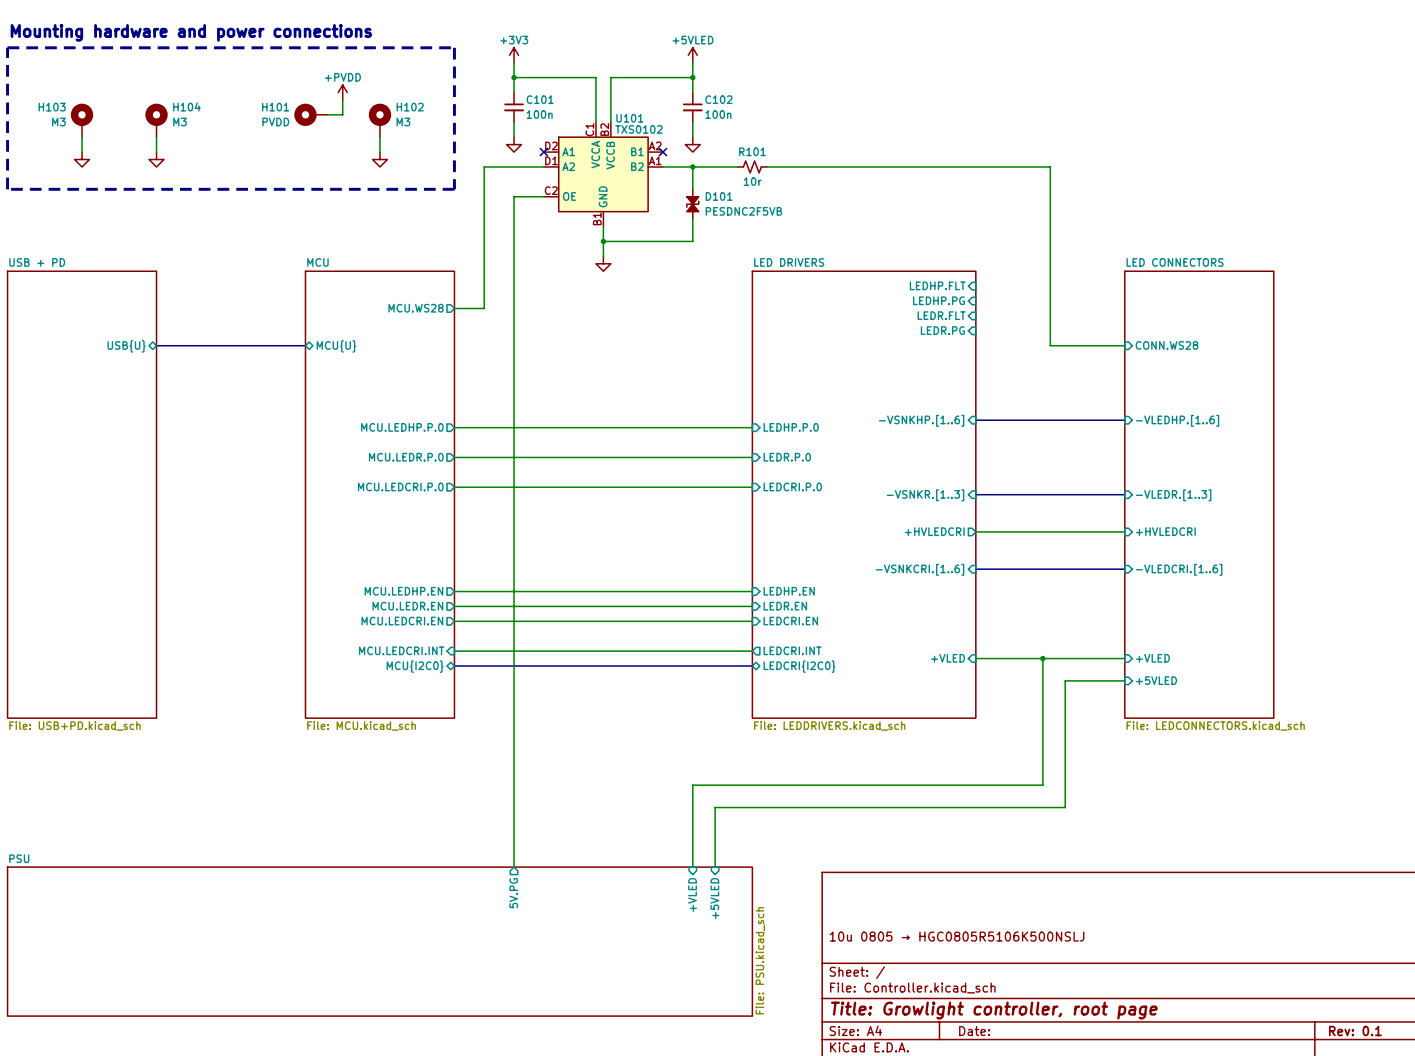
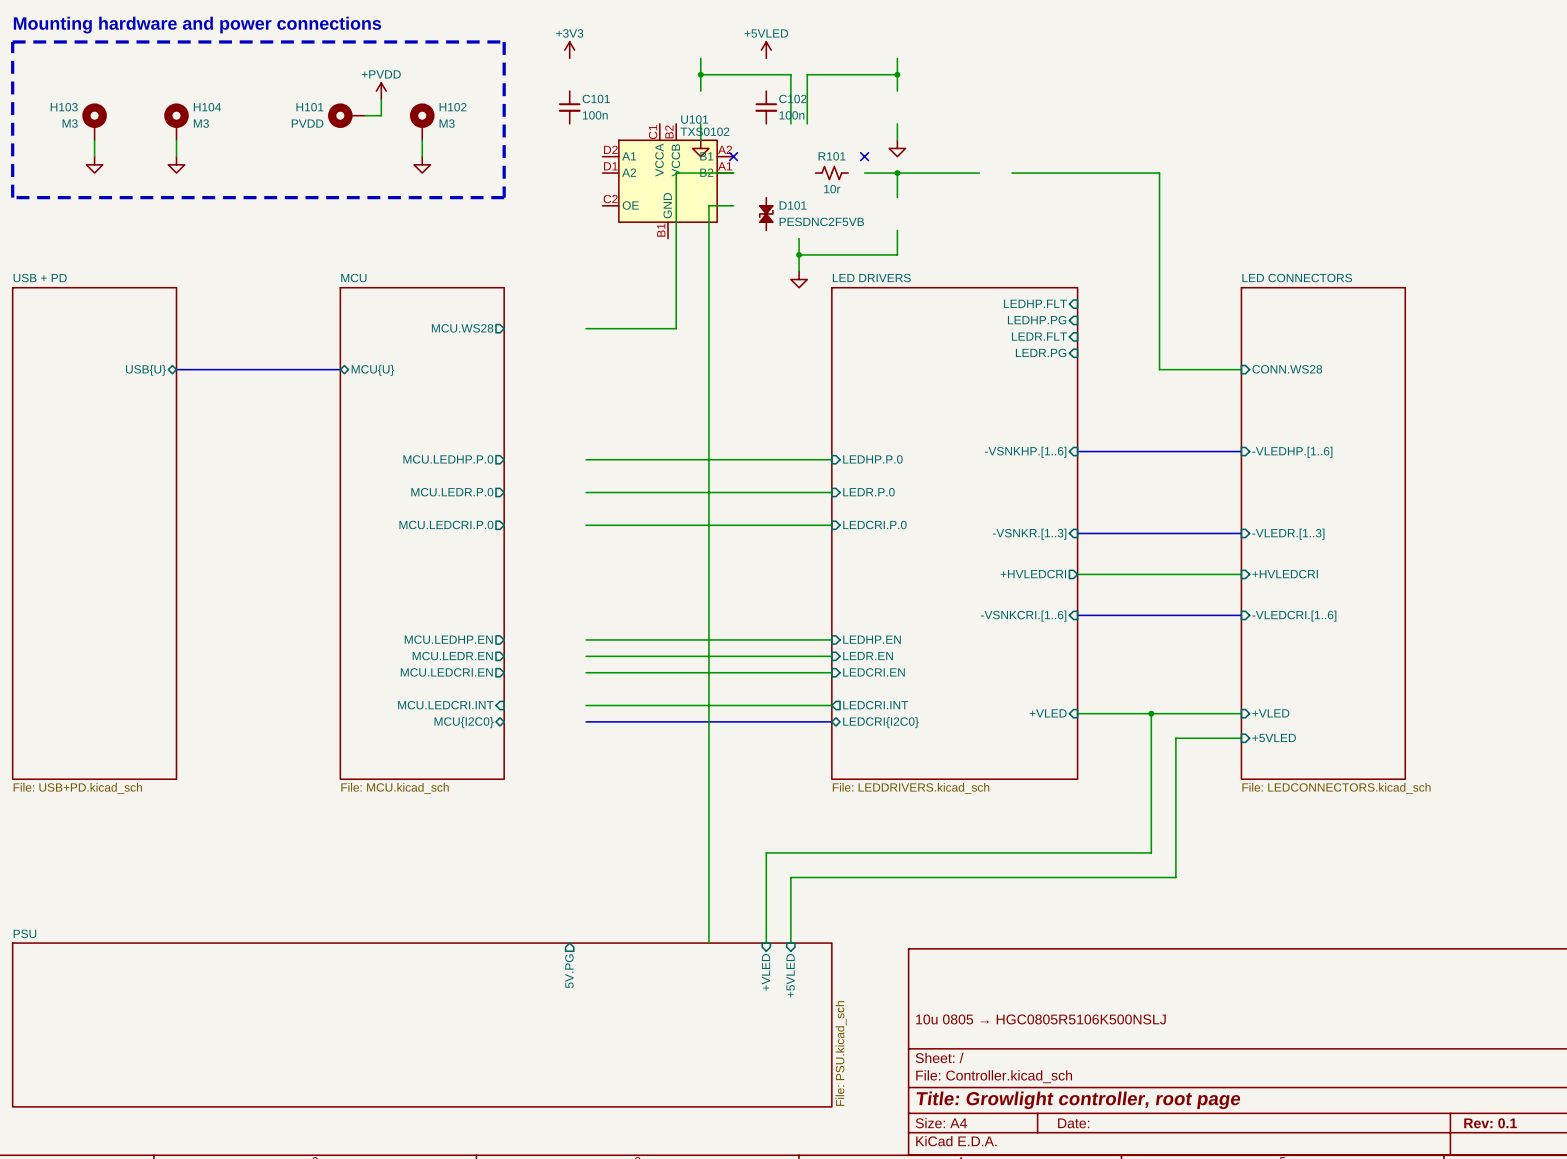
wire: (514, 62) (514, 92) -> (700, 58) (700, 91)
wire: (692, 62) (692, 92) -> (897, 58) (897, 91)
wire: (514, 77) (595, 77) (595, 122) -> none
junction: (514, 77) -> none
wire: (633, 77) (610, 77) (610, 122) -> none
junction: none -> (700, 74)
wire: none -> (766, 74) (790, 74) (790, 123)
junction: (692, 77) -> none
wire: none -> (897, 74) (807, 74) (807, 123)
junction: none -> (897, 74)
wire: (514, 122) (514, 137) -> (700, 123) (700, 140)
wire: (692, 122) (692, 137) -> (897, 123) (897, 140)
power symbol: (514, 144) -> none
power symbol: none -> (700, 148)
power symbol: (692, 144) -> none
power symbol: none -> (897, 148)
no-connect mark: (543, 152) -> none
no-connect mark: none -> (864, 156)
wire: (543, 166) (484, 166) (484, 308) (454, 308) -> none
wire: (663, 166) (737, 166) -> (733, 173) (676, 173) (676, 328) (586, 328)
wire: (692, 166) (692, 189) -> (897, 173) (897, 197)
junction: (692, 166) -> none
wire: (767, 166) (782, 166) -> none
junction: none -> (897, 173)
wire: (886, 166) (916, 166) -> none
wire: (543, 196) (514, 196) (514, 867) -> none
wire: none -> (733, 205) (708, 205) (708, 943)
wire: (692, 219) (692, 241) (603, 241) -> (897, 230) (897, 254) (799, 254)
wire: (603, 226) (603, 256) -> (799, 238) (799, 271)
junction: (603, 241) -> none
junction: none -> (799, 254)
power symbol: (603, 263) -> none
power symbol: none -> (799, 279)
wire: (454, 427) (528, 427) -> none
wire: (454, 457) (528, 457) -> none
wire: (454, 487) (528, 487) -> none
wire: (454, 591) (528, 591) -> none
wire: (454, 606) (528, 606) -> none
wire: (454, 621) (528, 621) -> none
wire: (454, 651) (528, 651) -> none
bus: (454, 666) (528, 666) -> none

